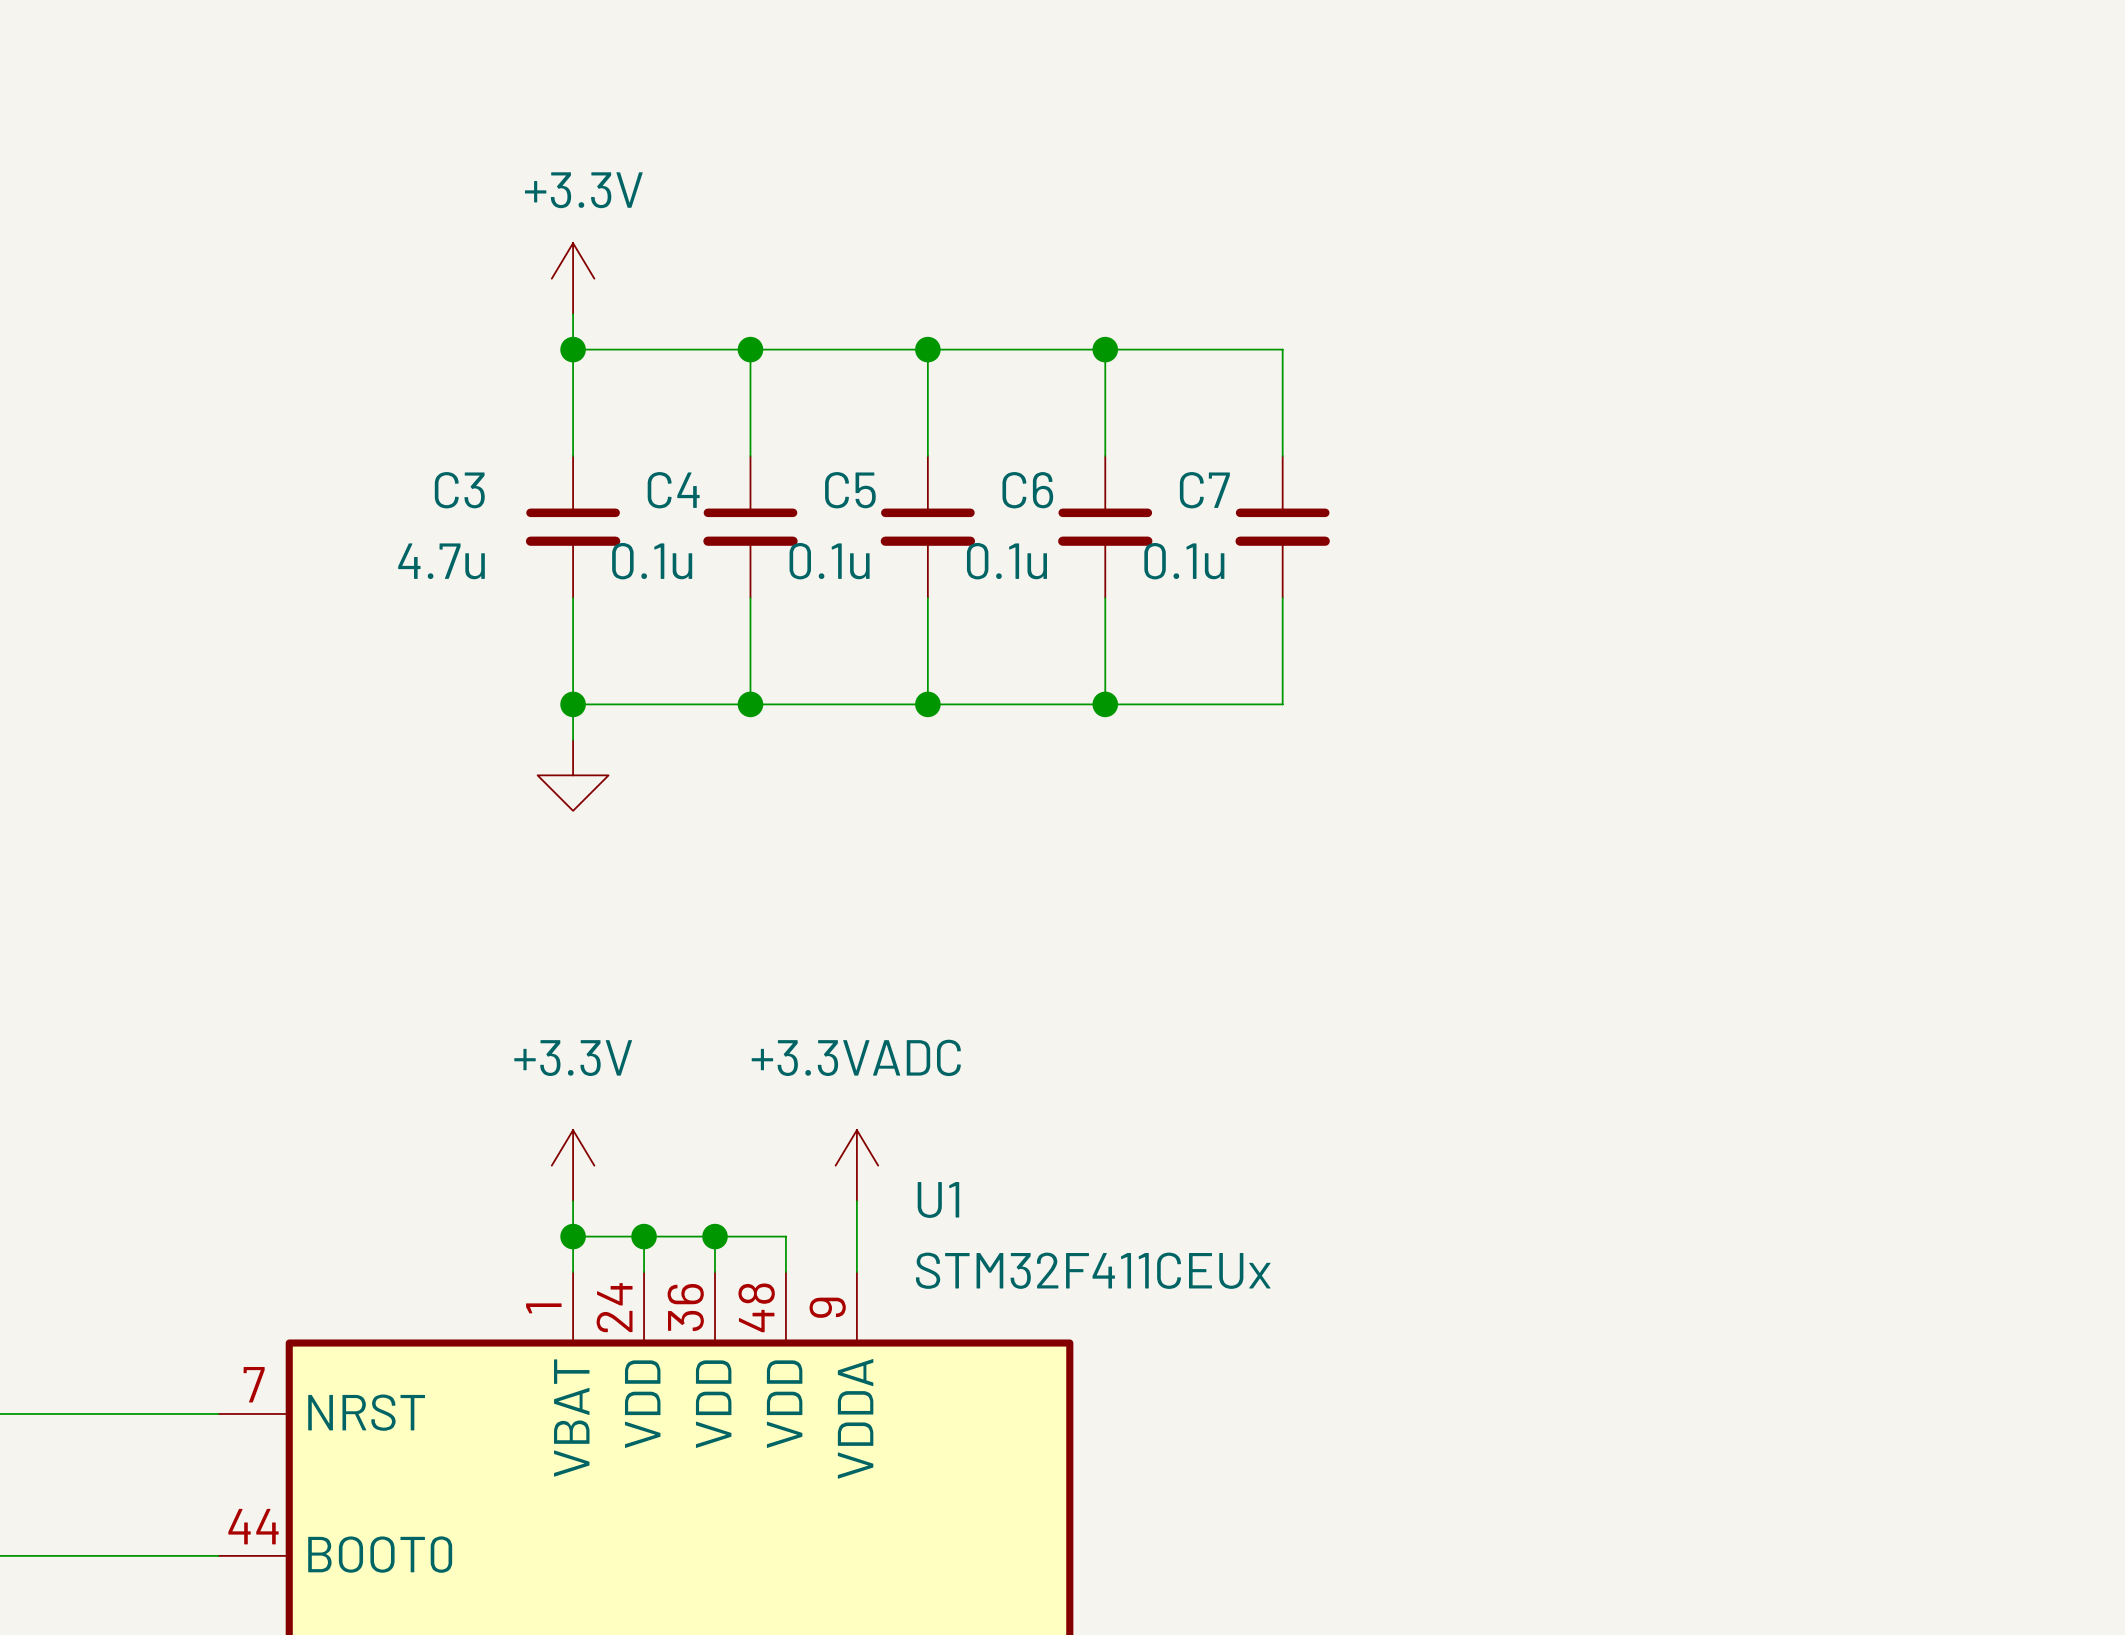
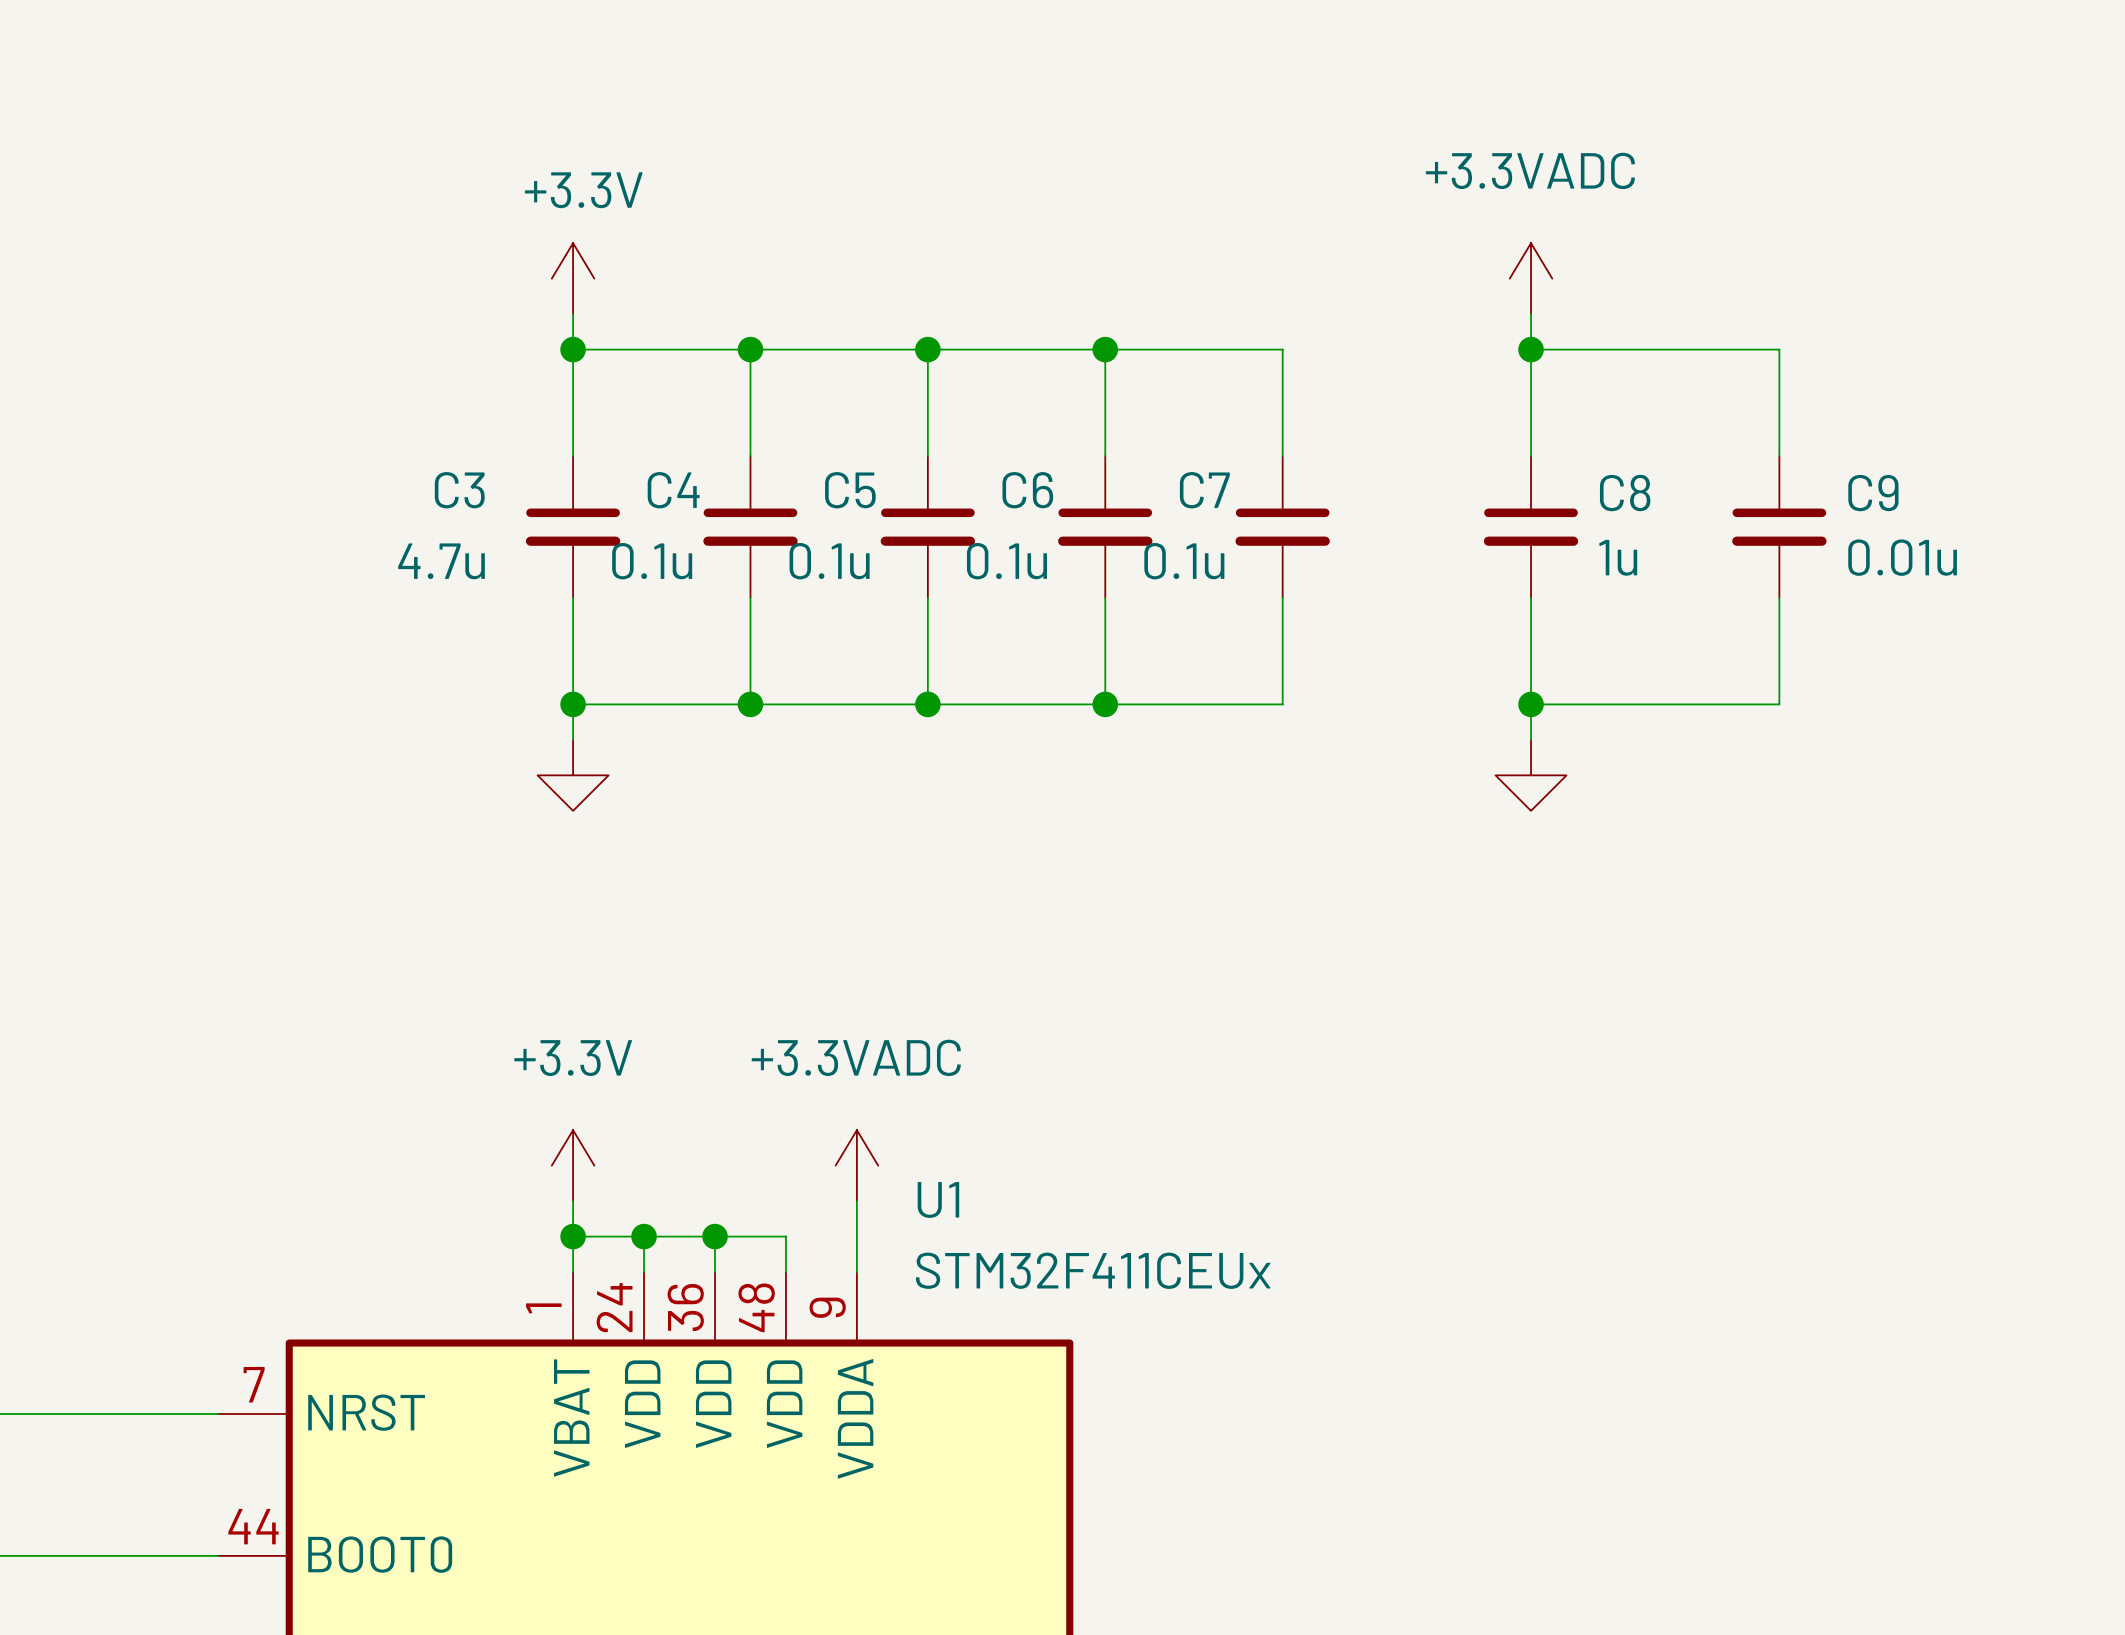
power symbol: none -> +3.3VADC (1531, 278)
wire: none -> (1531, 314) (1531, 456)
wire: none -> (1531, 349) (1779, 349) (1779, 456)
junction: none -> (1531, 349)
C8: none -> 1u (1531, 527)
C9: none -> 0.01u (1779, 527)
wire: none -> (1531, 597) (1531, 739)
wire: none -> (1779, 597) (1779, 704) (1531, 704)
junction: none -> (1531, 704)
power symbol: none -> (1531, 775)

